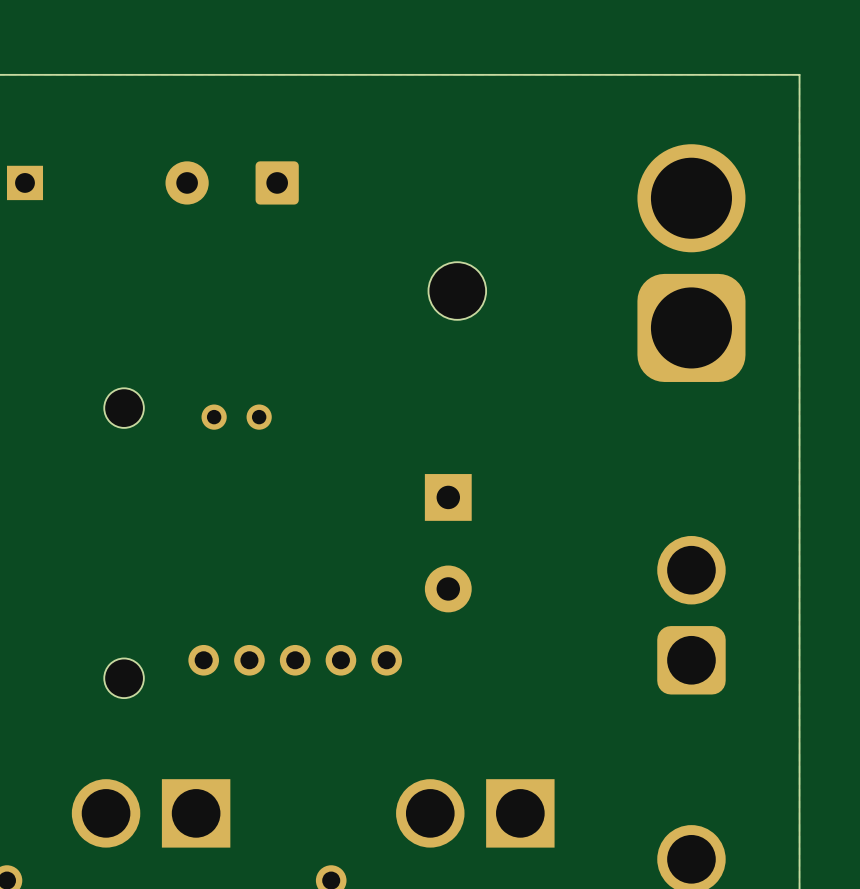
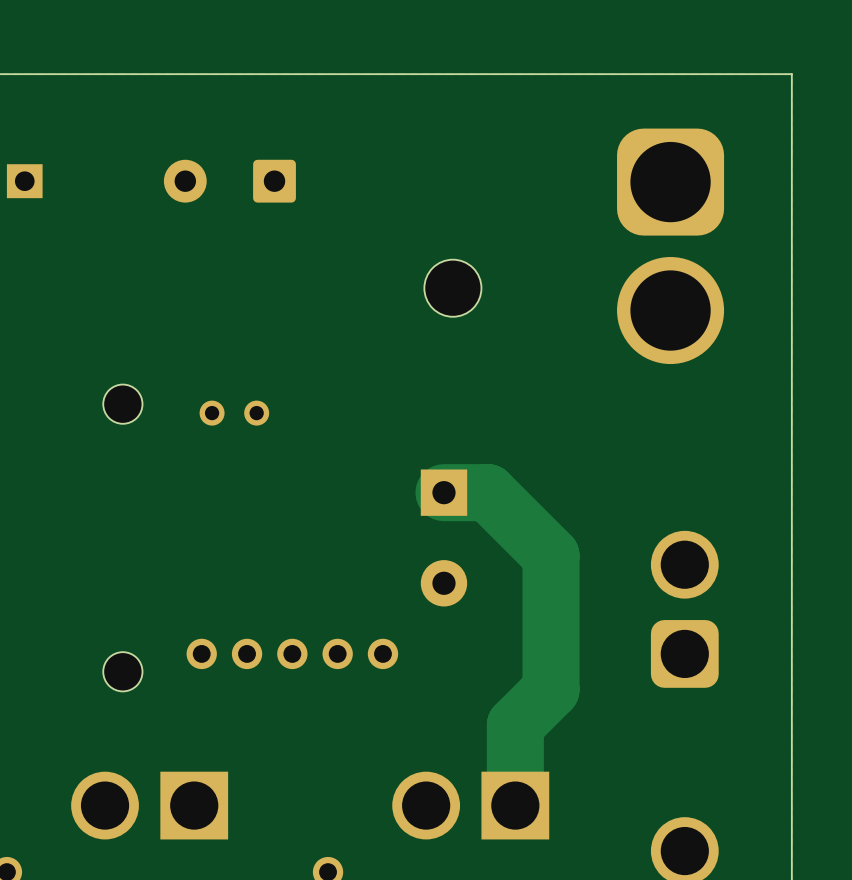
part rotation: 0° (691, 263) -> 180° (670, 246)
track: none -> (443, 492) (487, 492) (551, 555) (551, 689) (515, 725) (515, 805)

